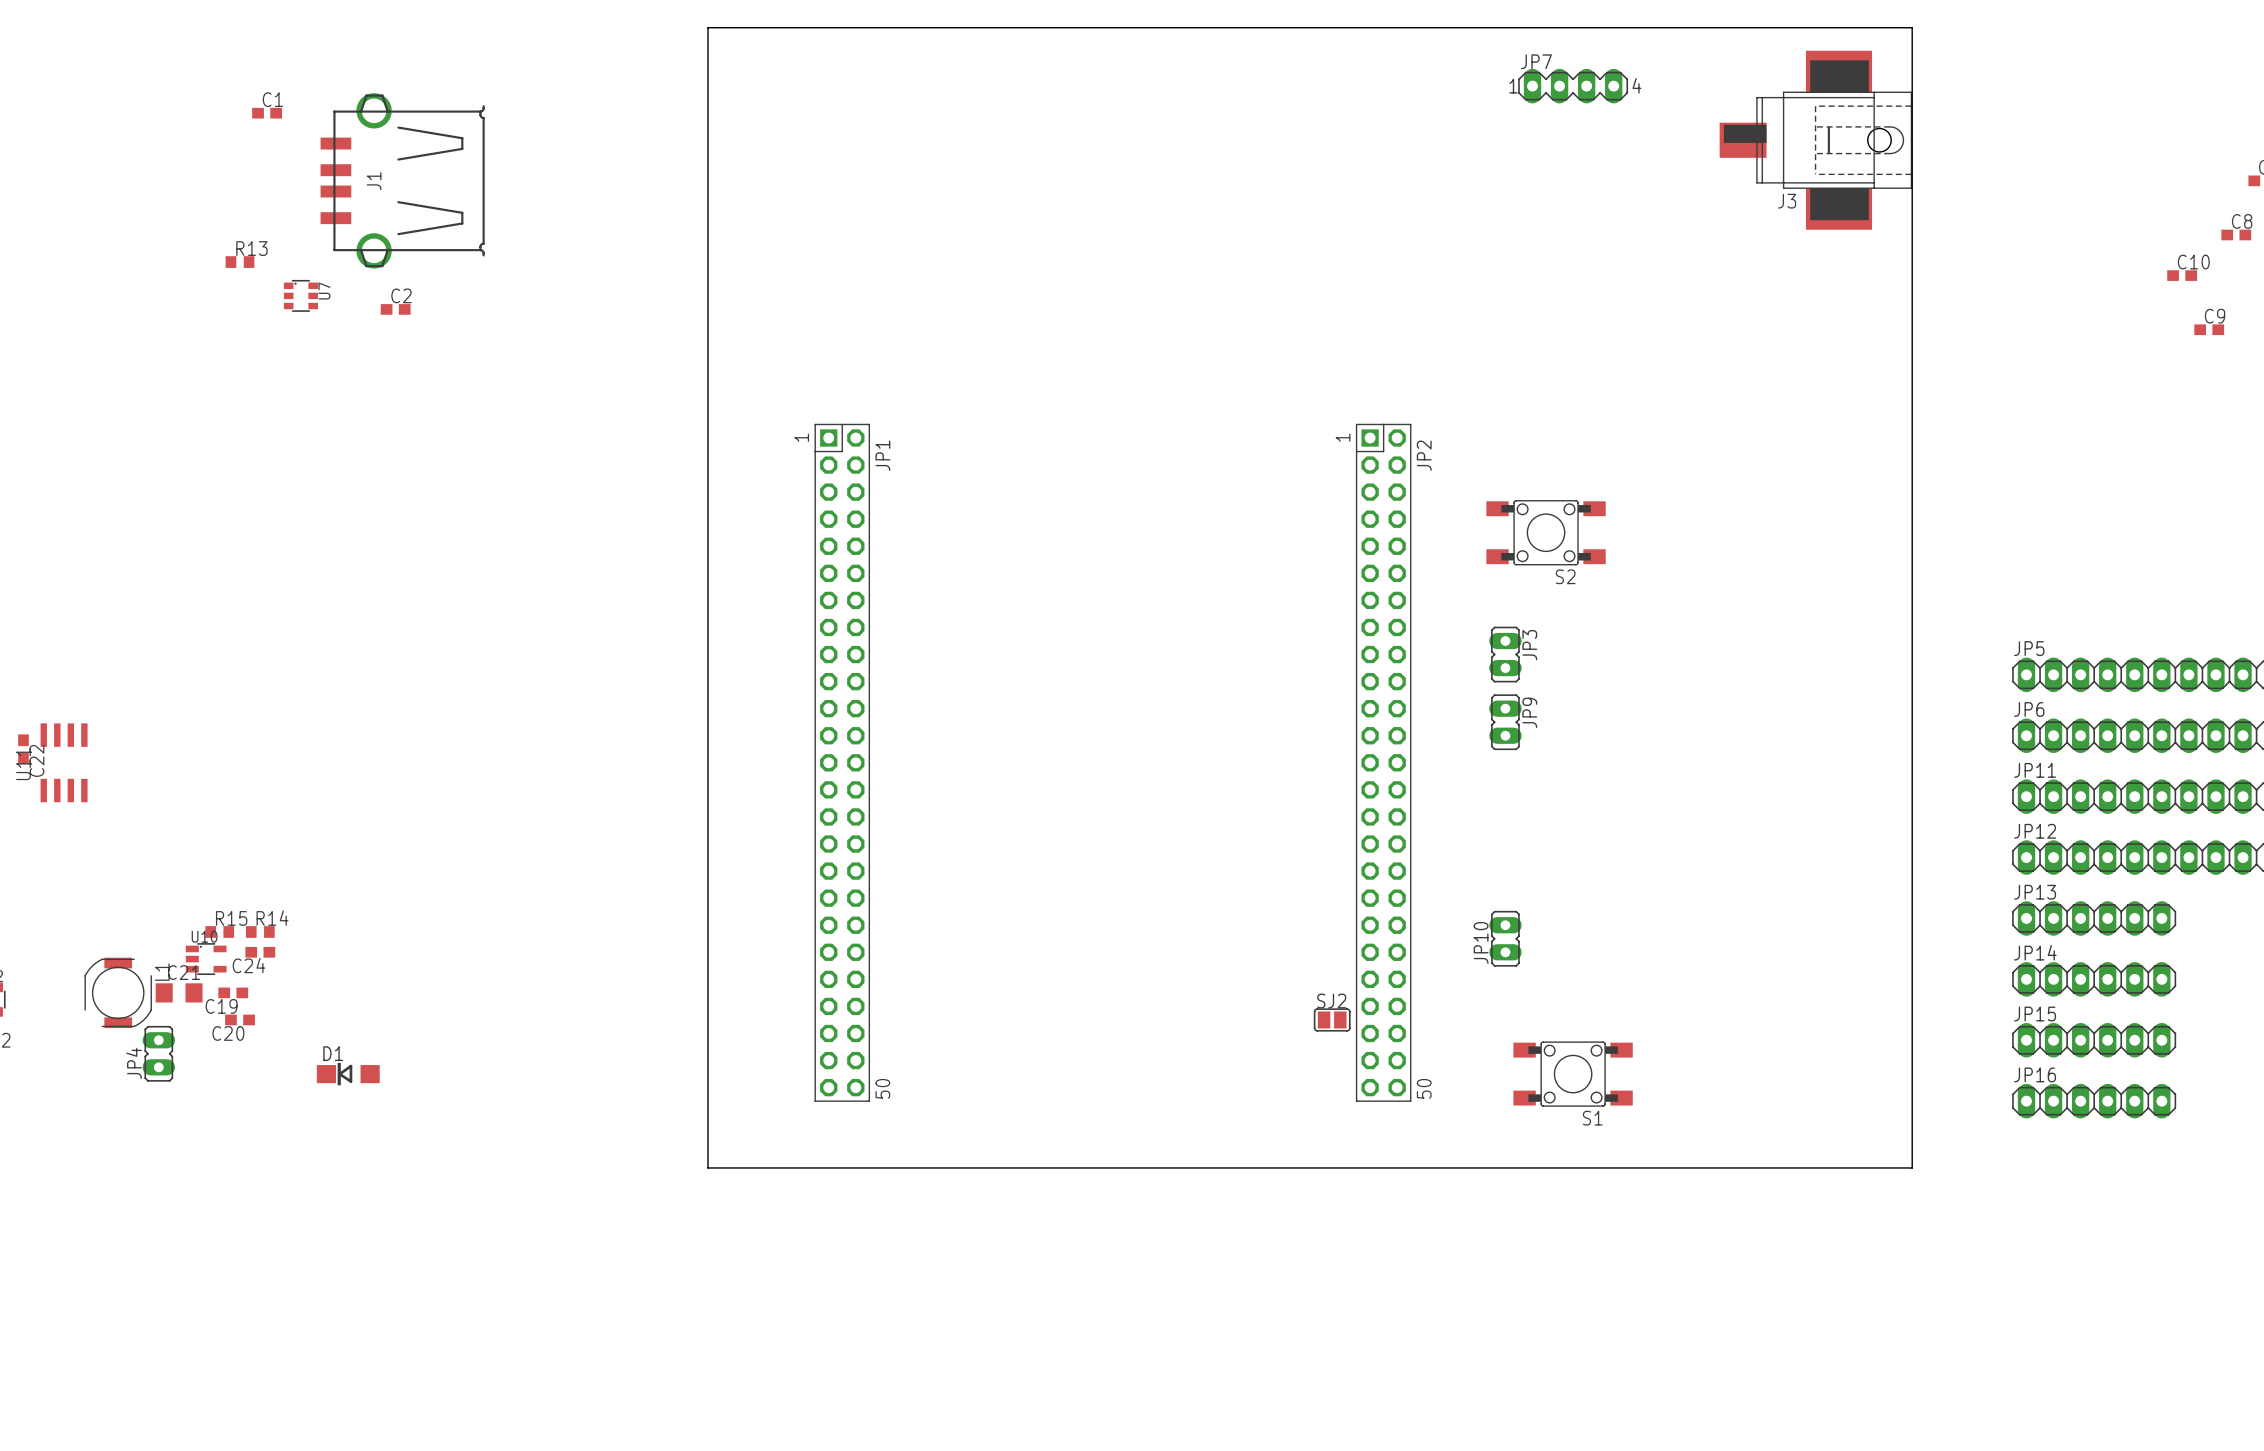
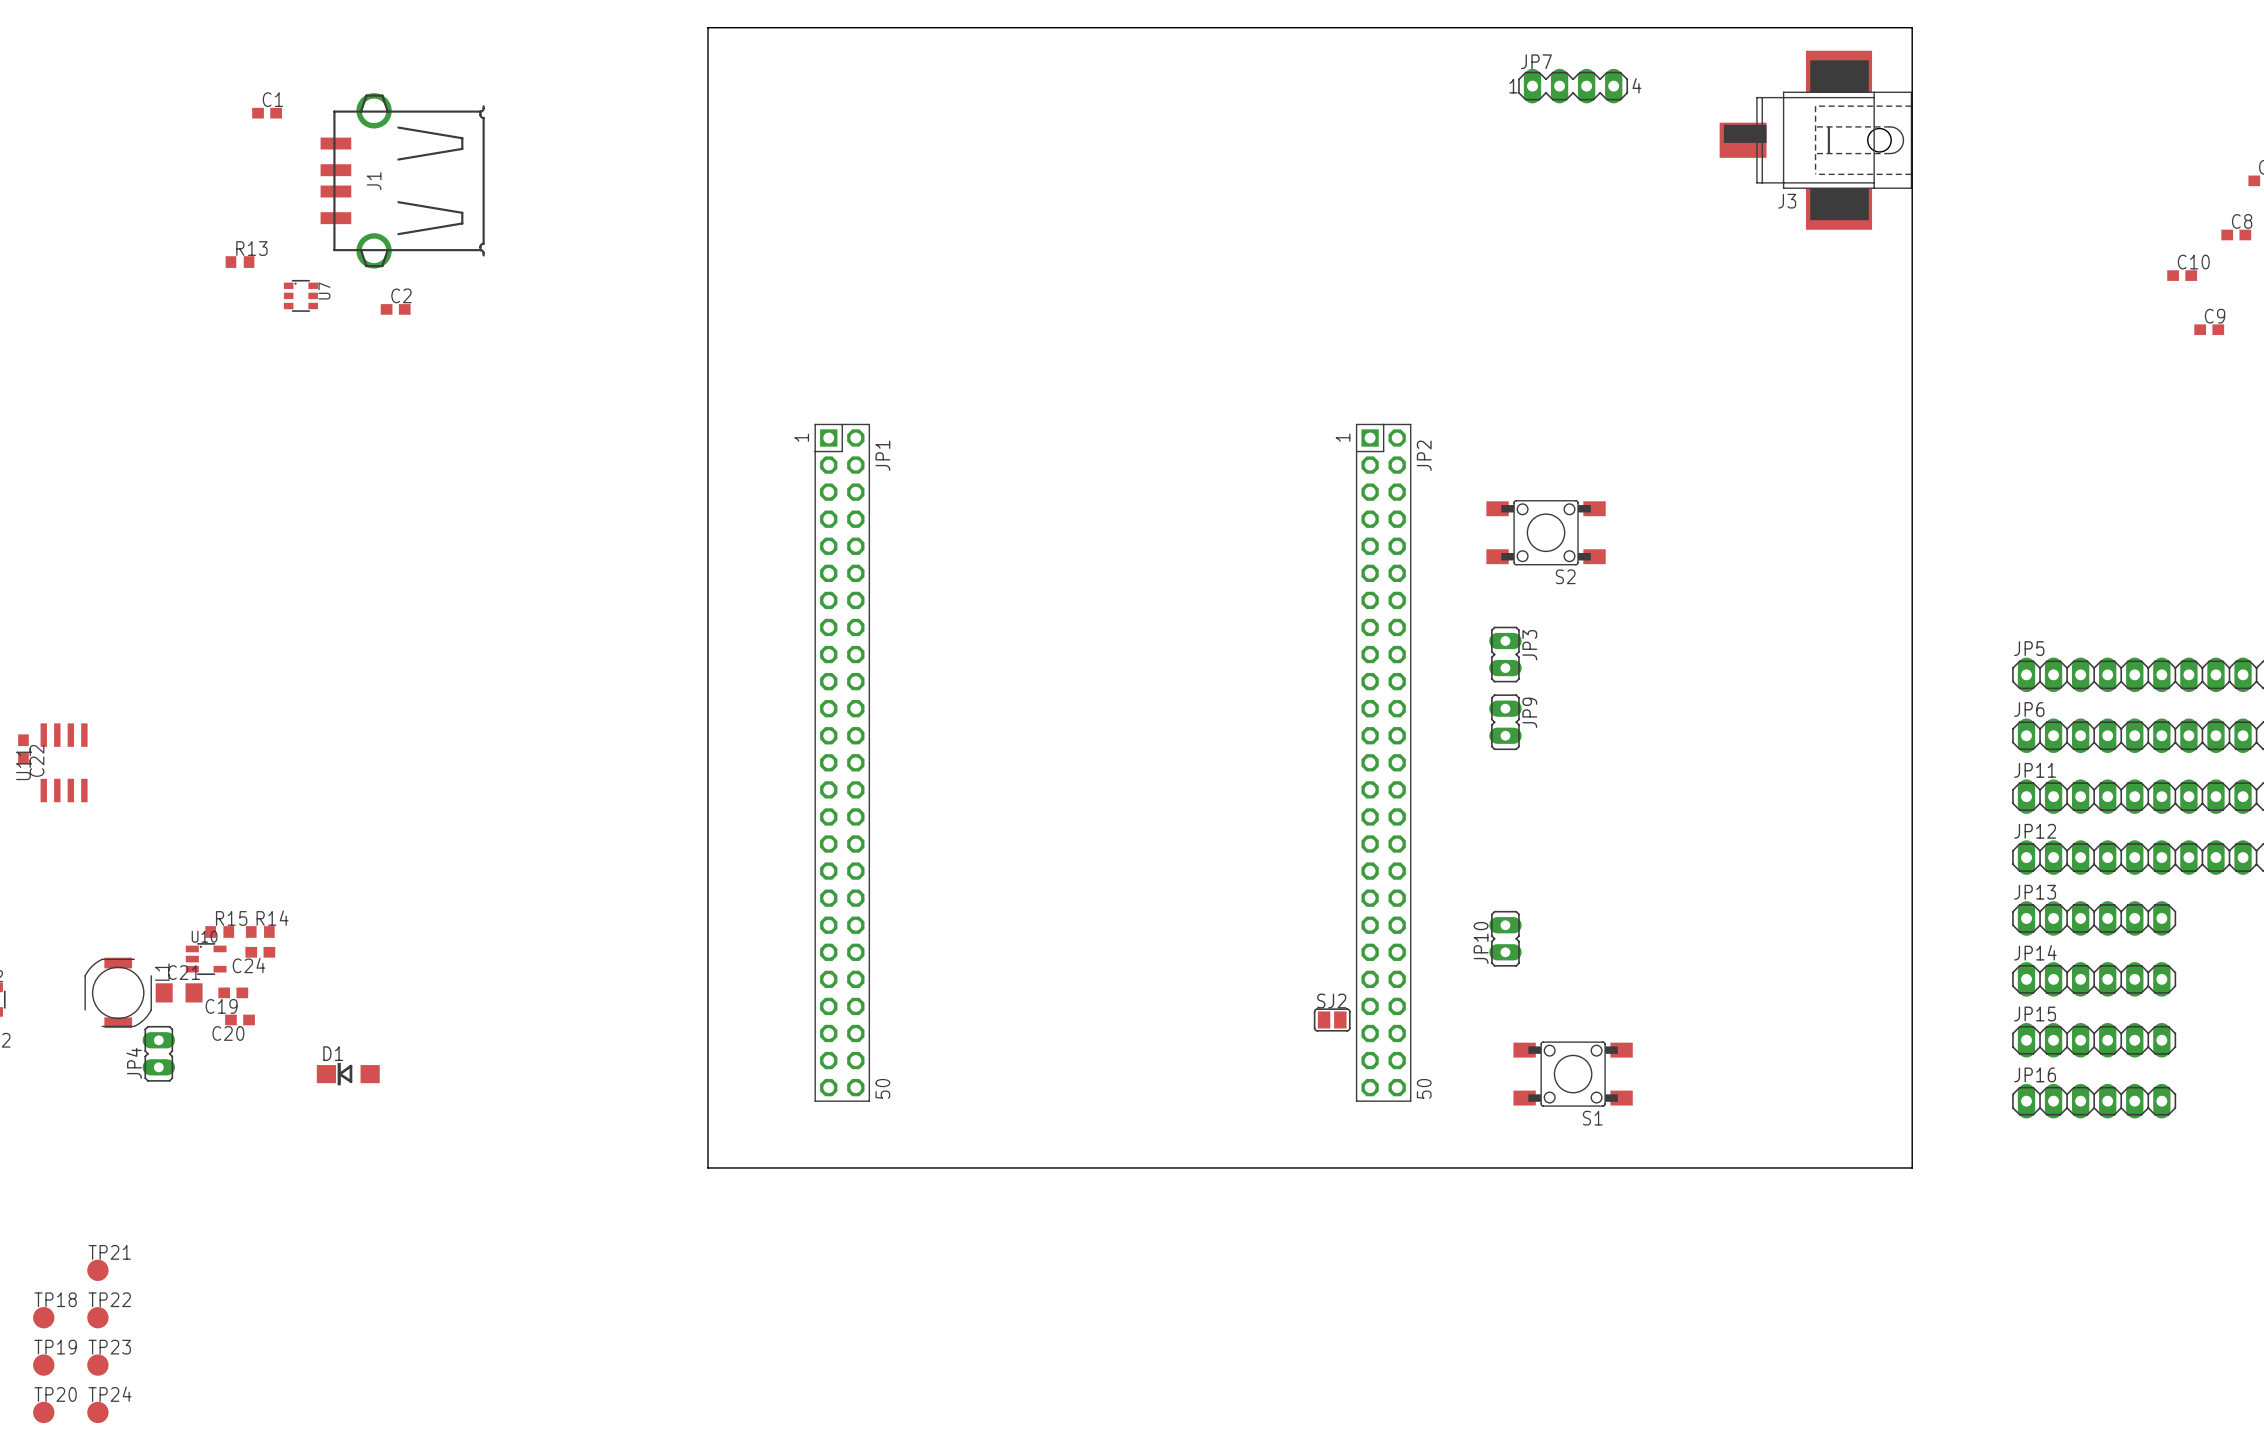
TP21: none -> (97, 1270)
TP18: none -> (43, 1317)
TP22: none -> (97, 1317)
TP19: none -> (43, 1365)
TP23: none -> (97, 1365)
TP20: none -> (43, 1412)
TP24: none -> (97, 1412)

